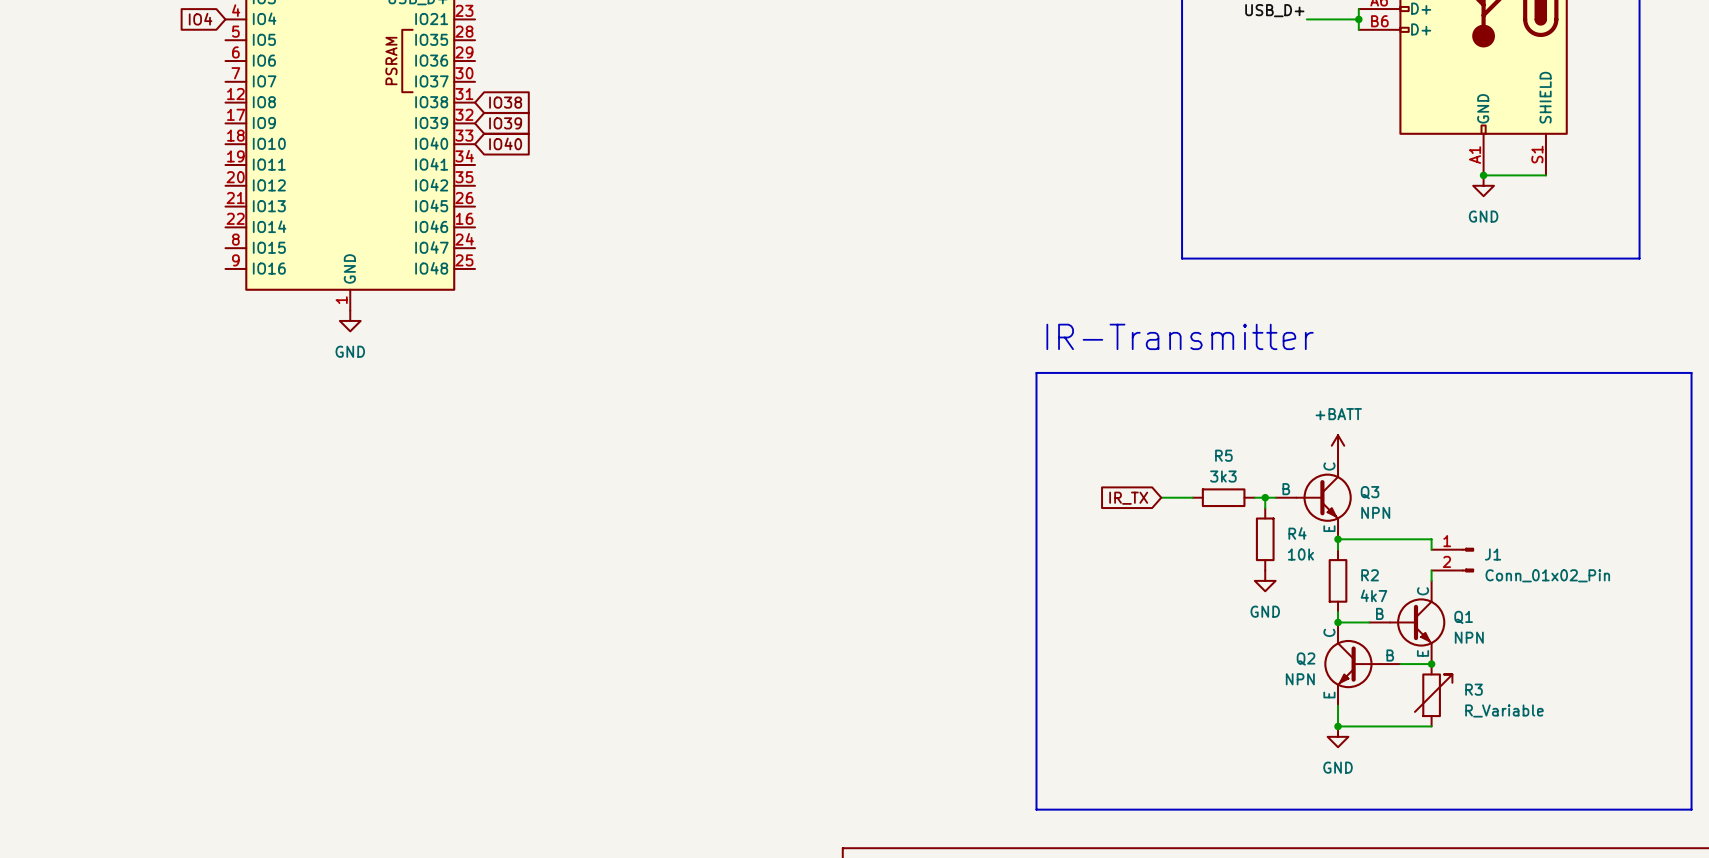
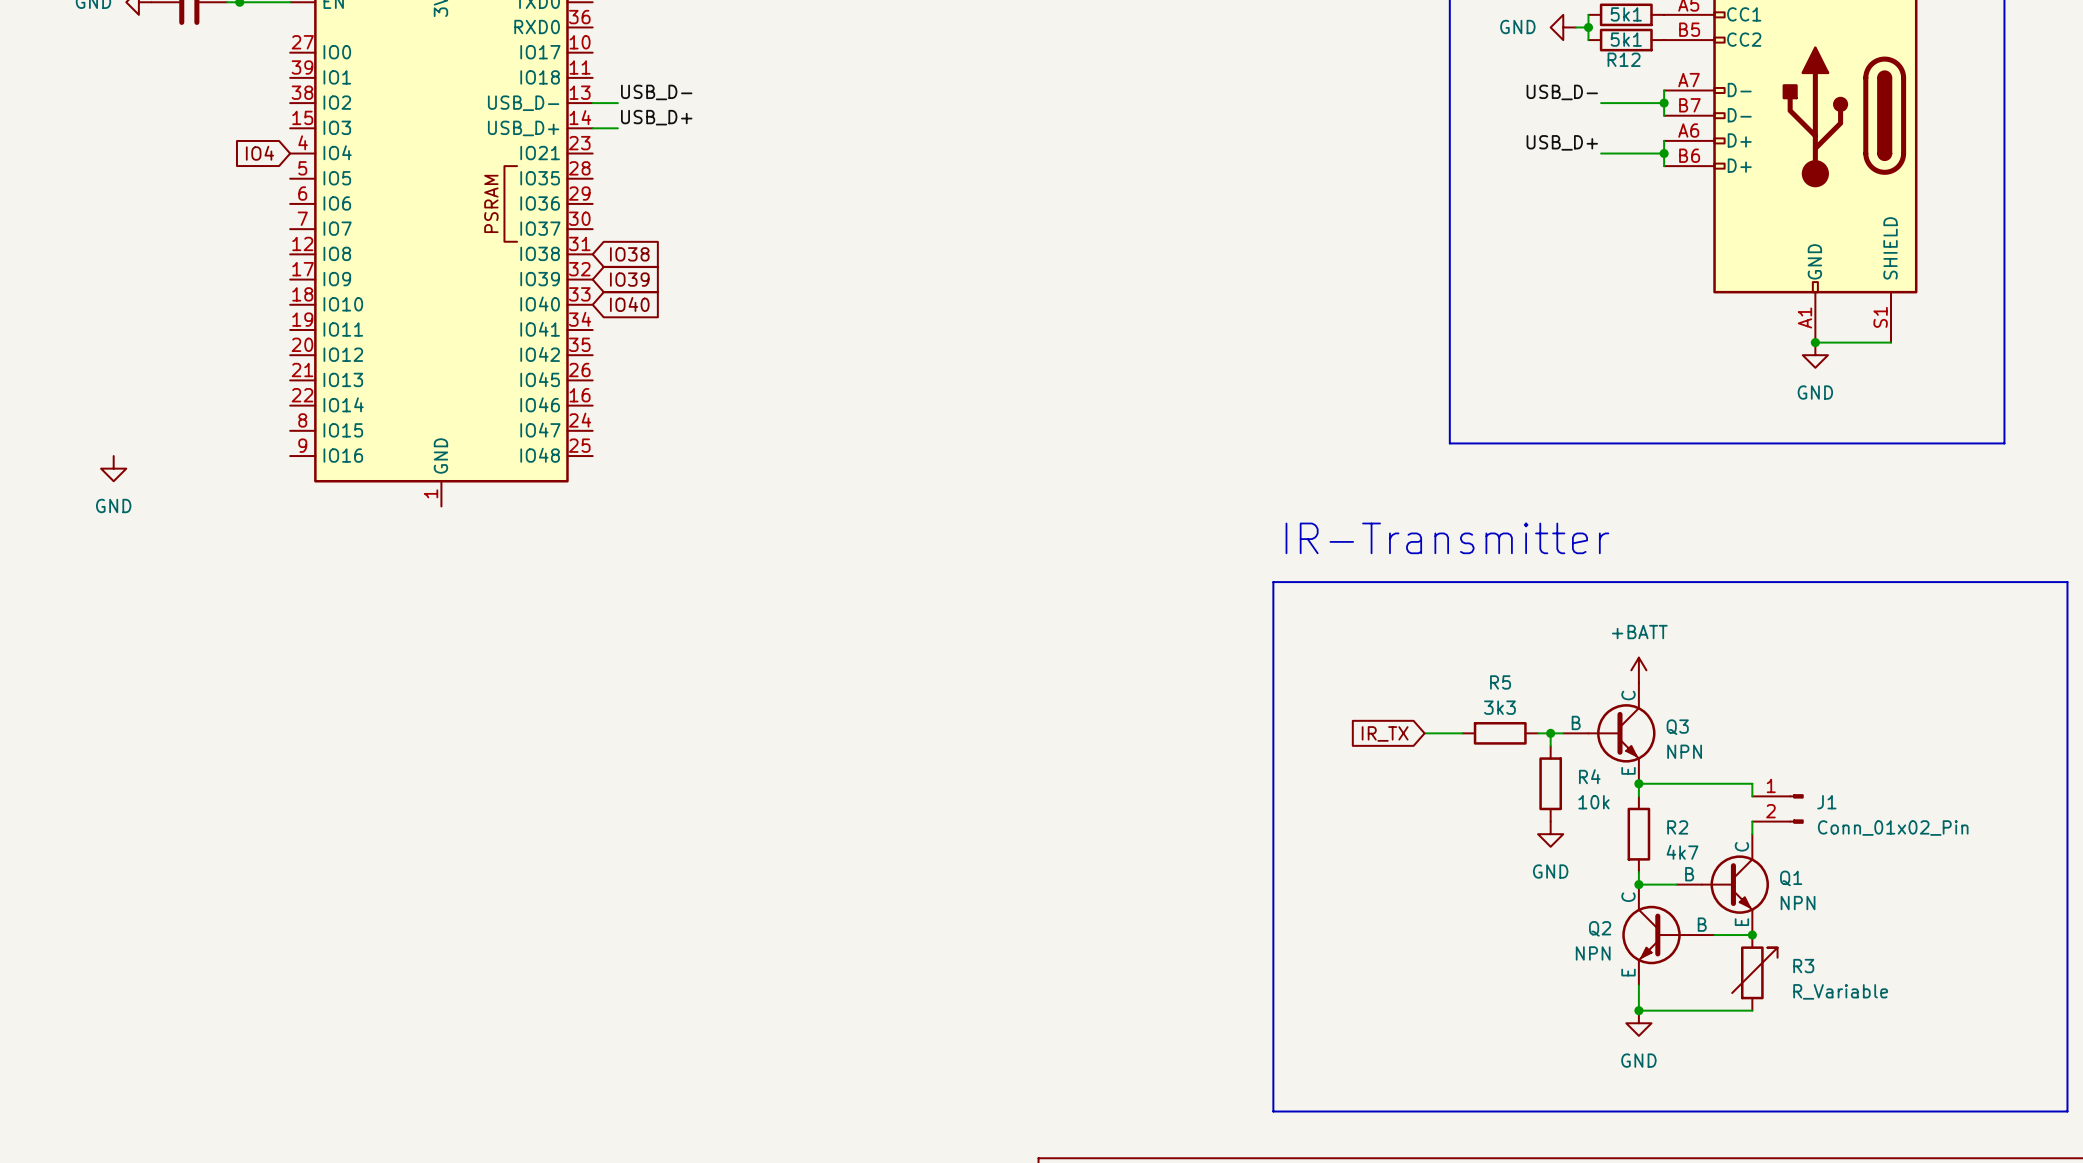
power symbol: none -> GND (113, 468)
power symbol: GND (350, 320) -> none

